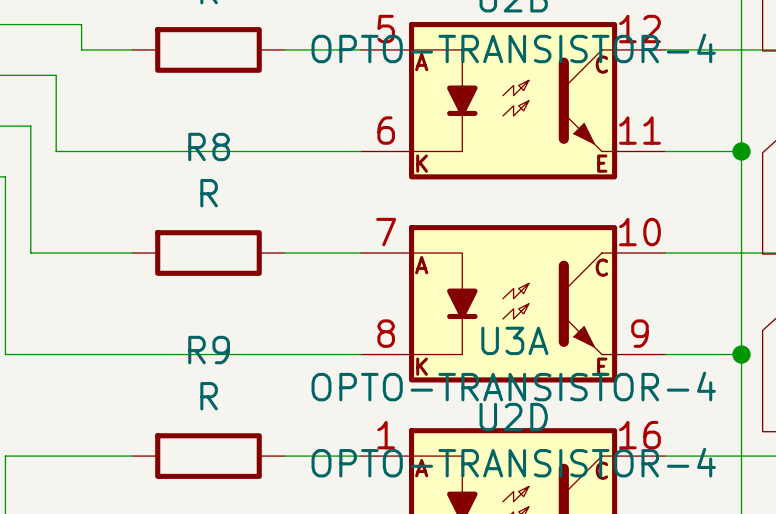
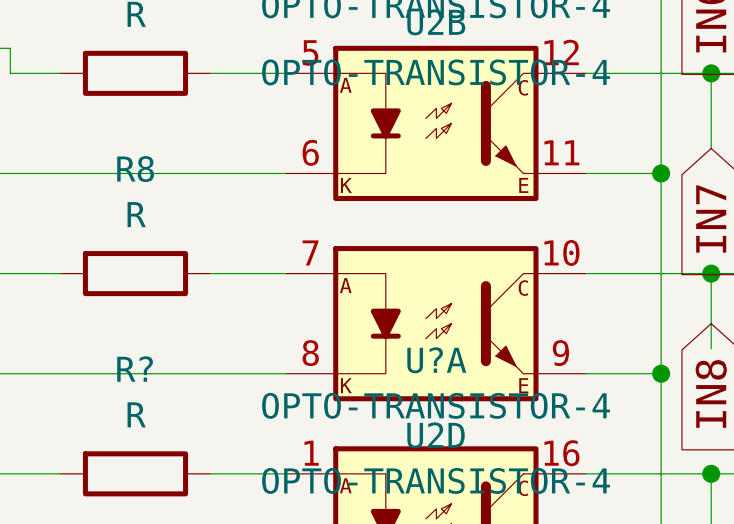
U3A name: U3A (514, 340) -> U?A (436, 360)
R9 name: R9 (209, 350) -> R? (135, 369)

